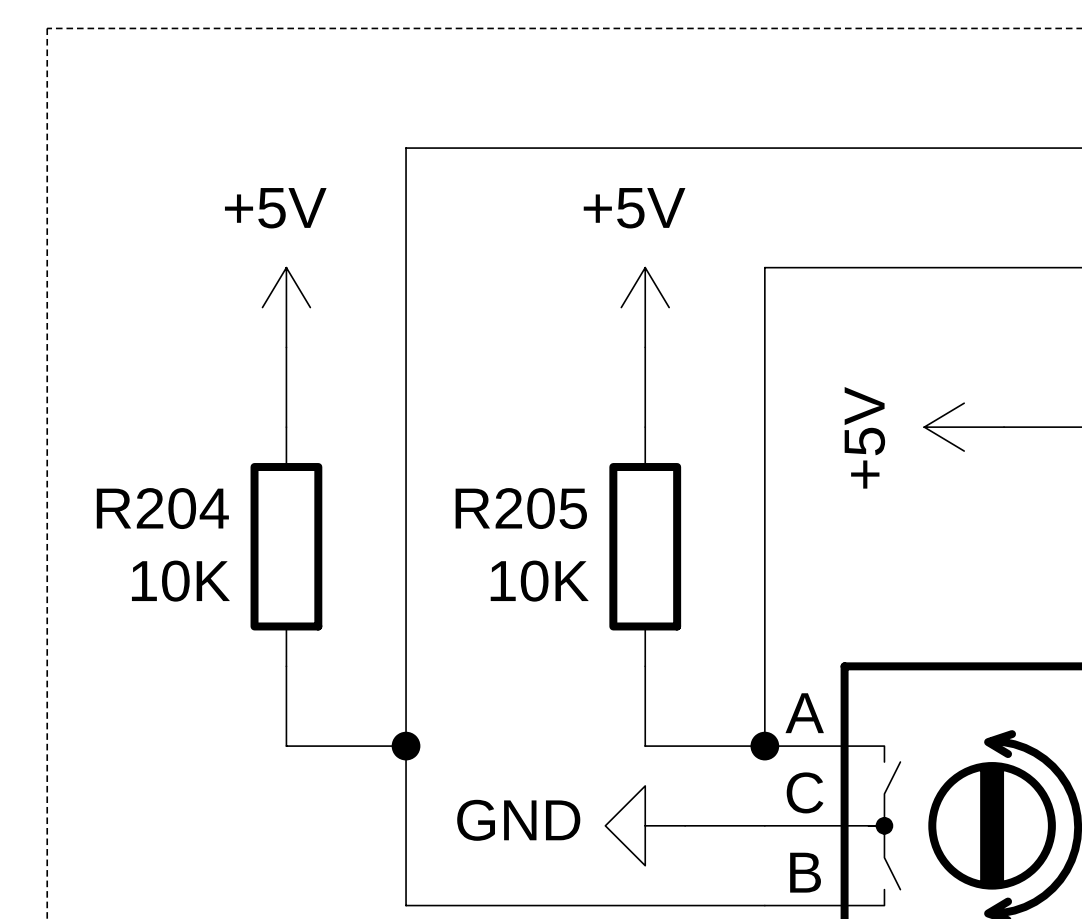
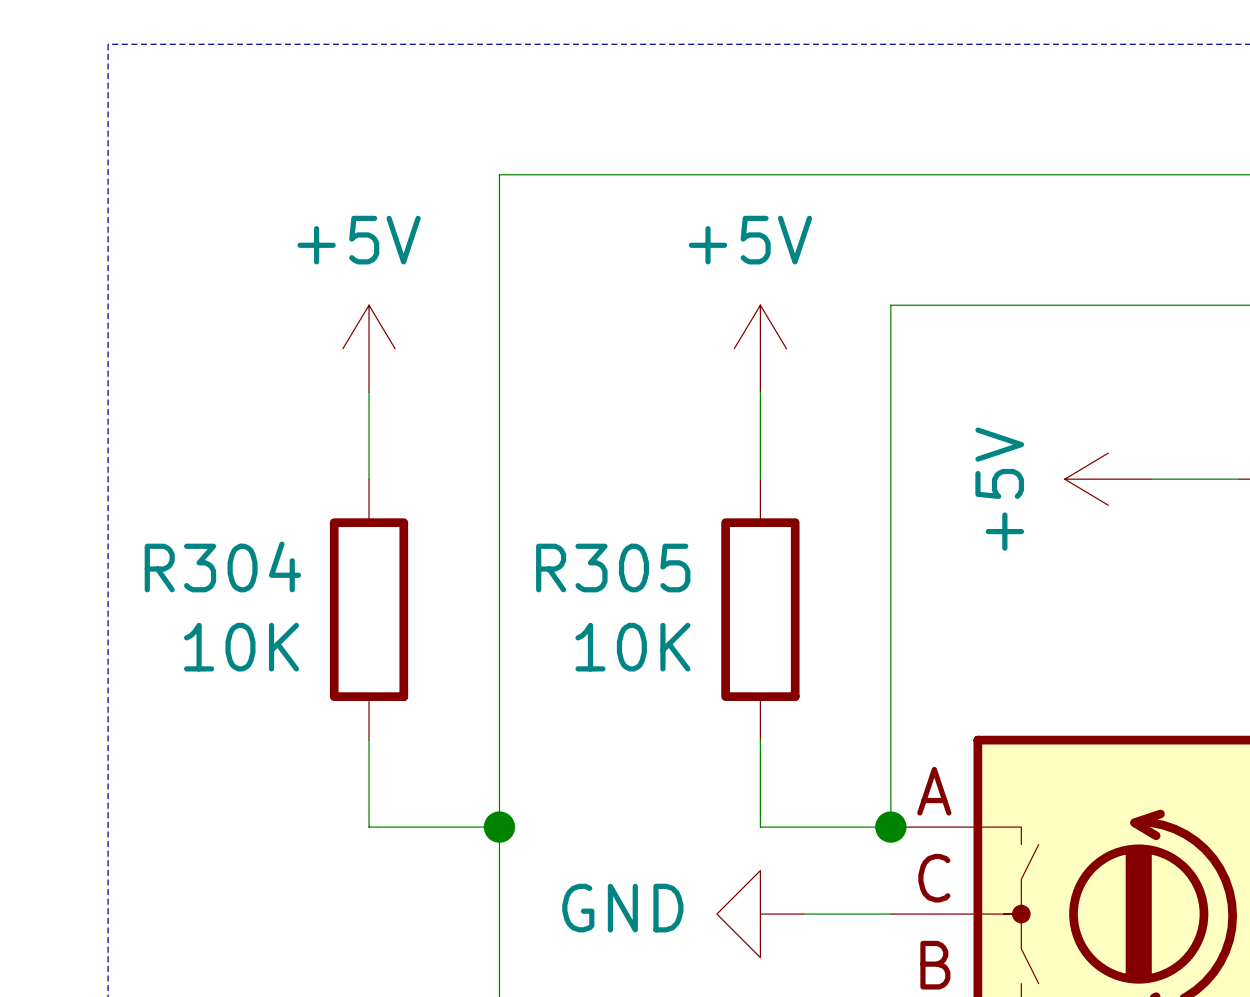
R204 name: R204 (162, 508) -> R304 (222, 566)
R205 name: R205 (521, 508) -> R305 (613, 568)

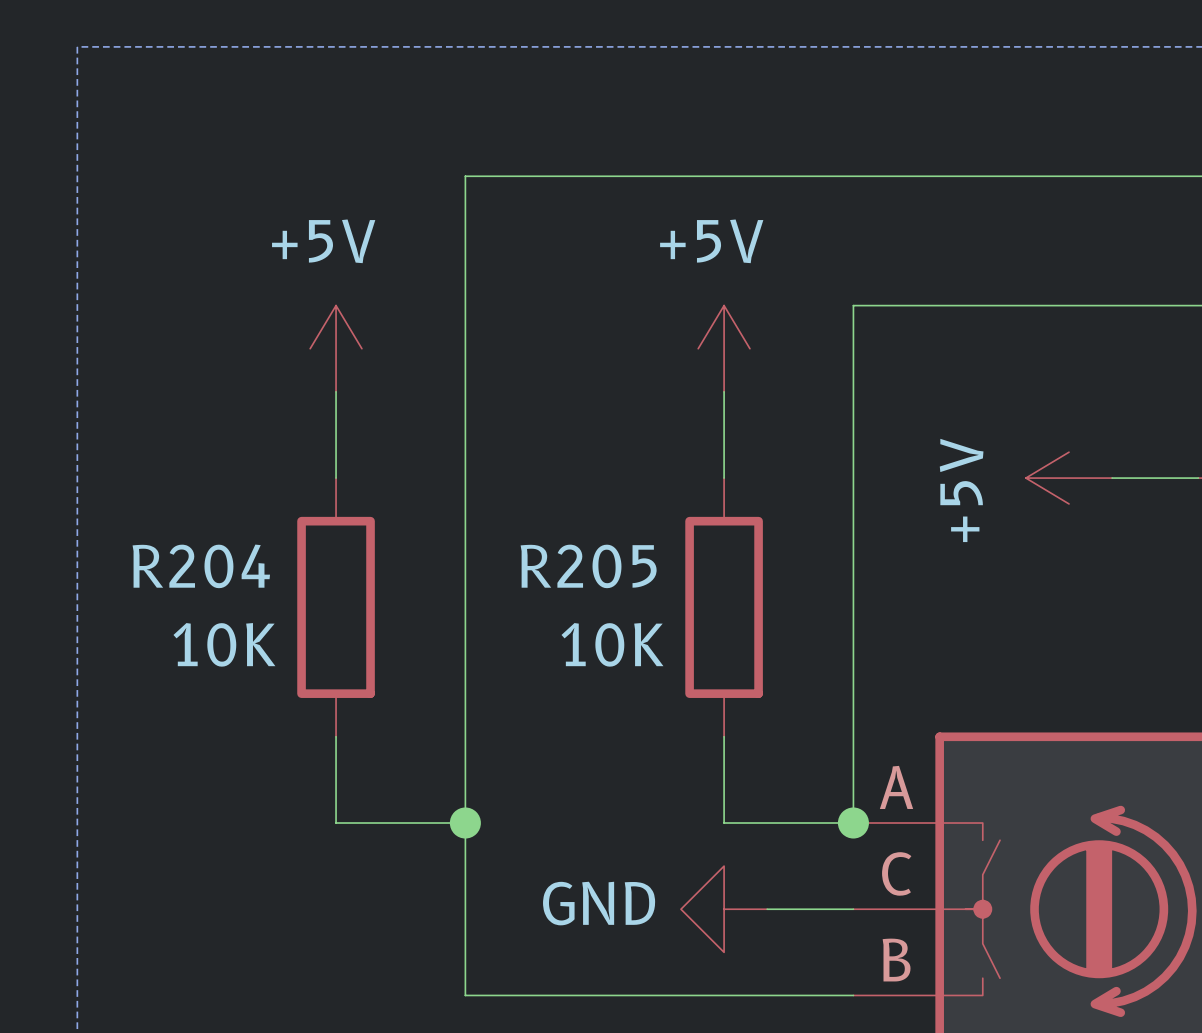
R304 name: R304 (222, 566) -> R204 (201, 566)
R305 name: R305 (613, 568) -> R205 (588, 566)

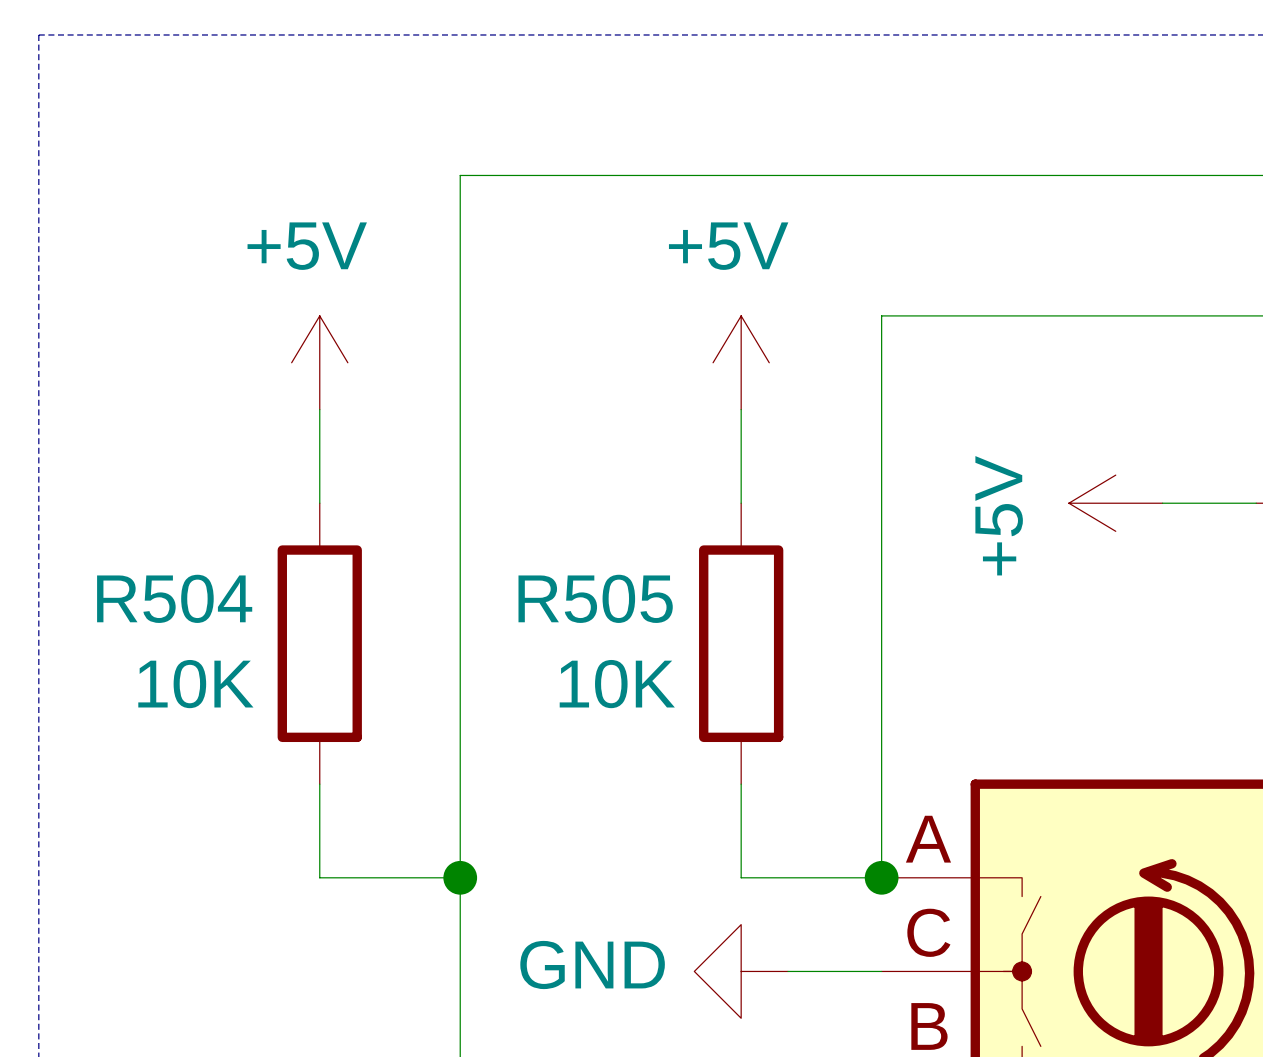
R204 name: R204 (201, 566) -> R504 (174, 598)
R205 name: R205 (588, 566) -> R505 (595, 598)

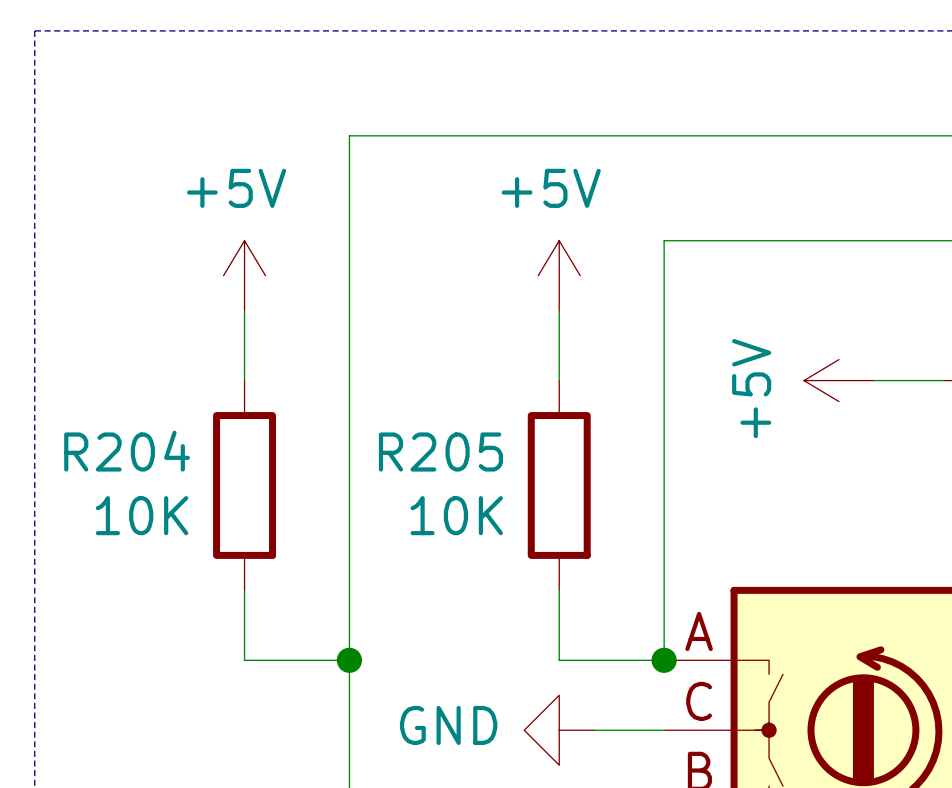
R504 name: R504 (174, 598) -> R204 (127, 451)
R505 name: R505 (595, 598) -> R205 (440, 452)

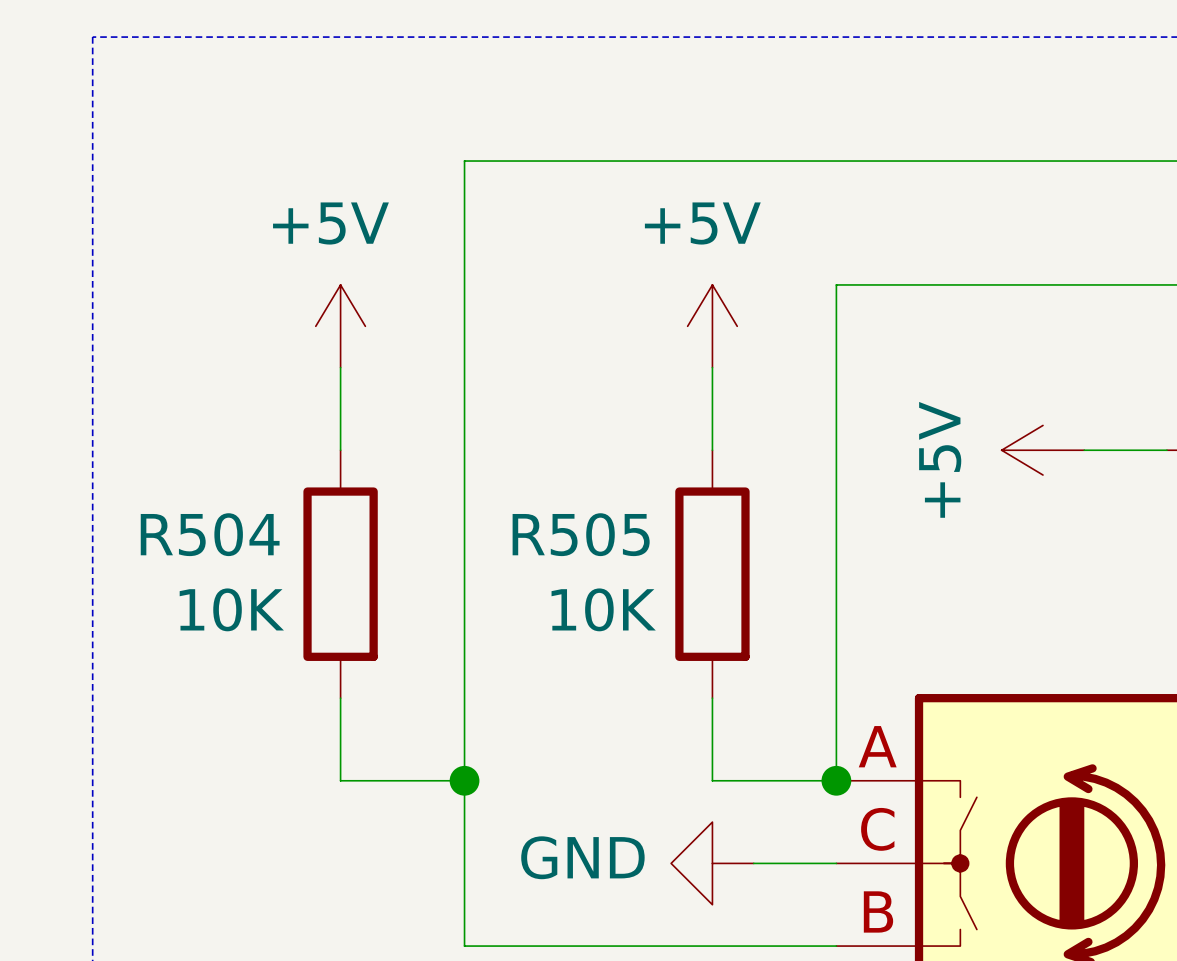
R204 name: R204 (127, 451) -> R504 (210, 534)
R205 name: R205 (440, 452) -> R505 (581, 534)

